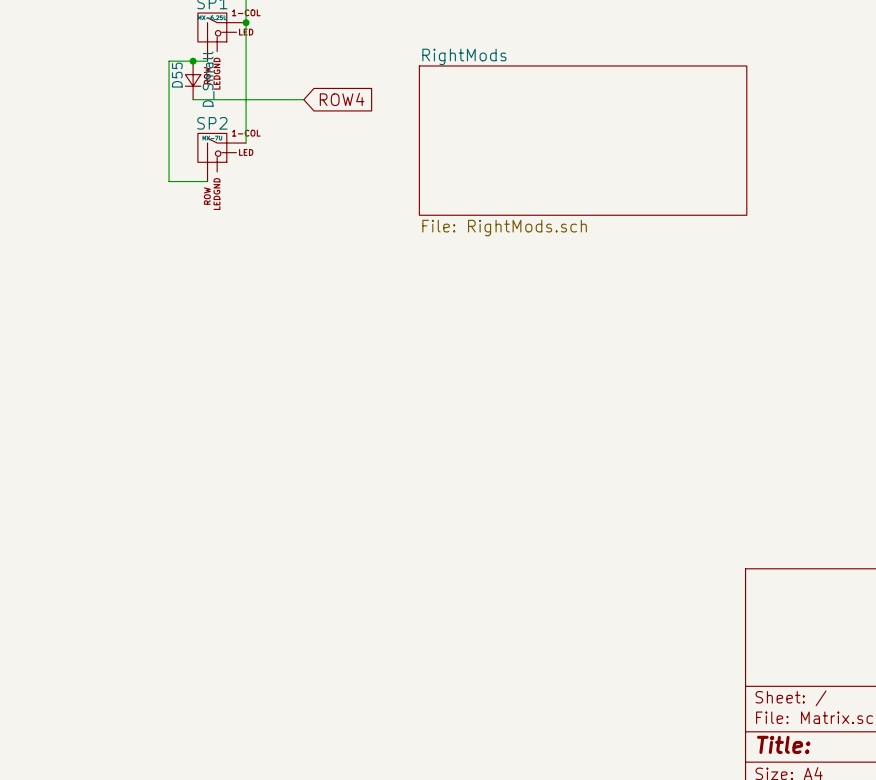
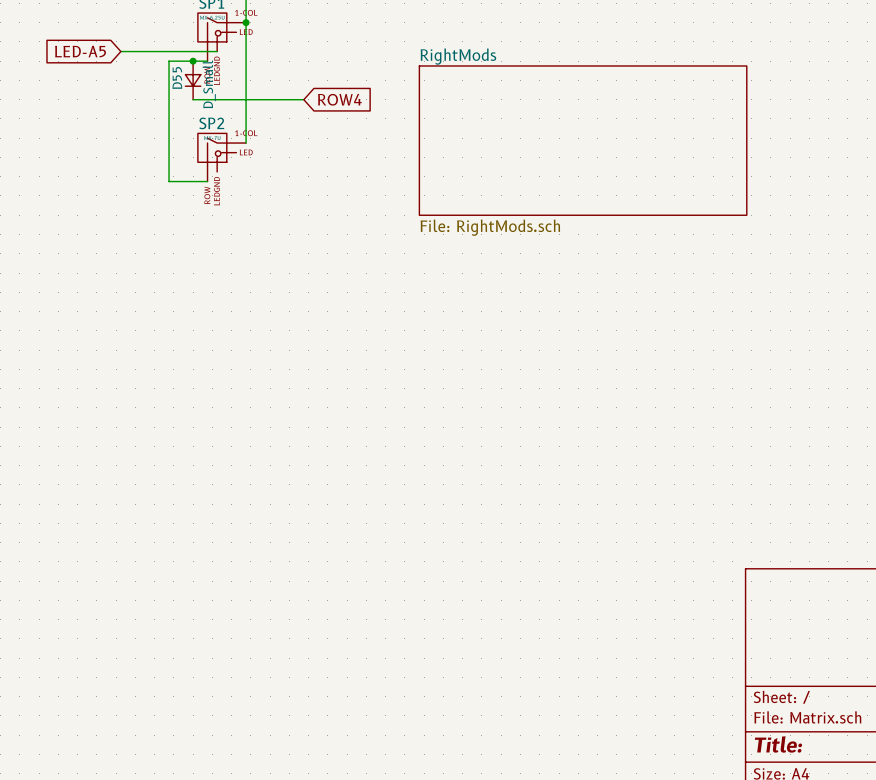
global label: none -> LED-A5 (80, 51)
wire: none -> (120, 51) (217, 51)

